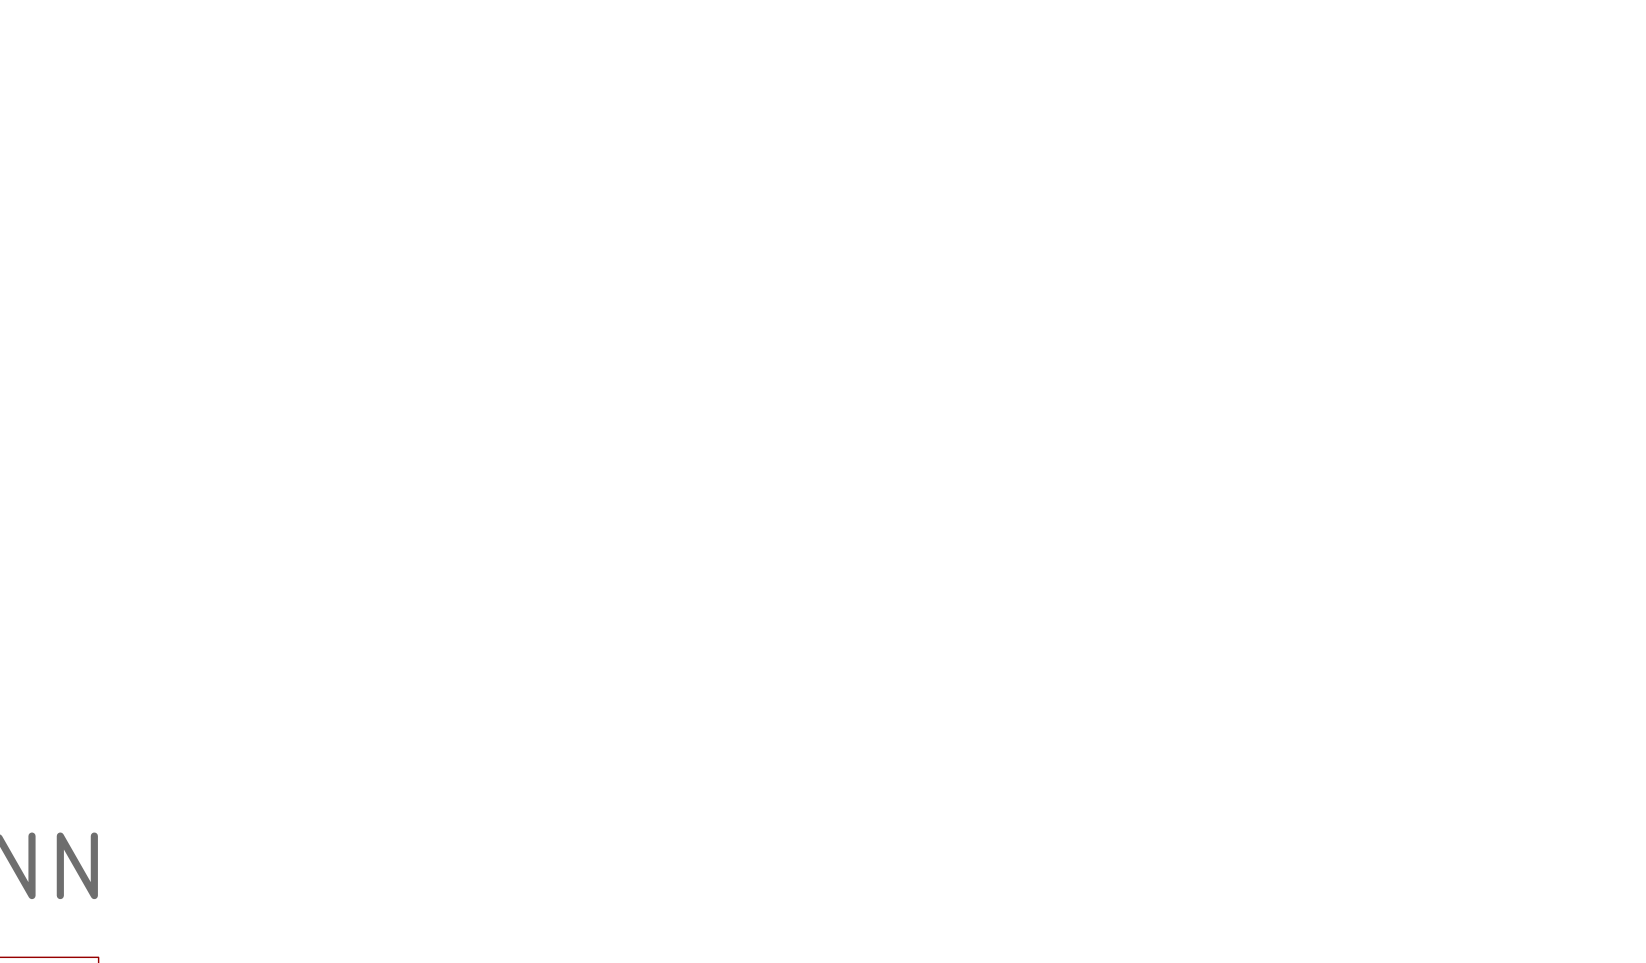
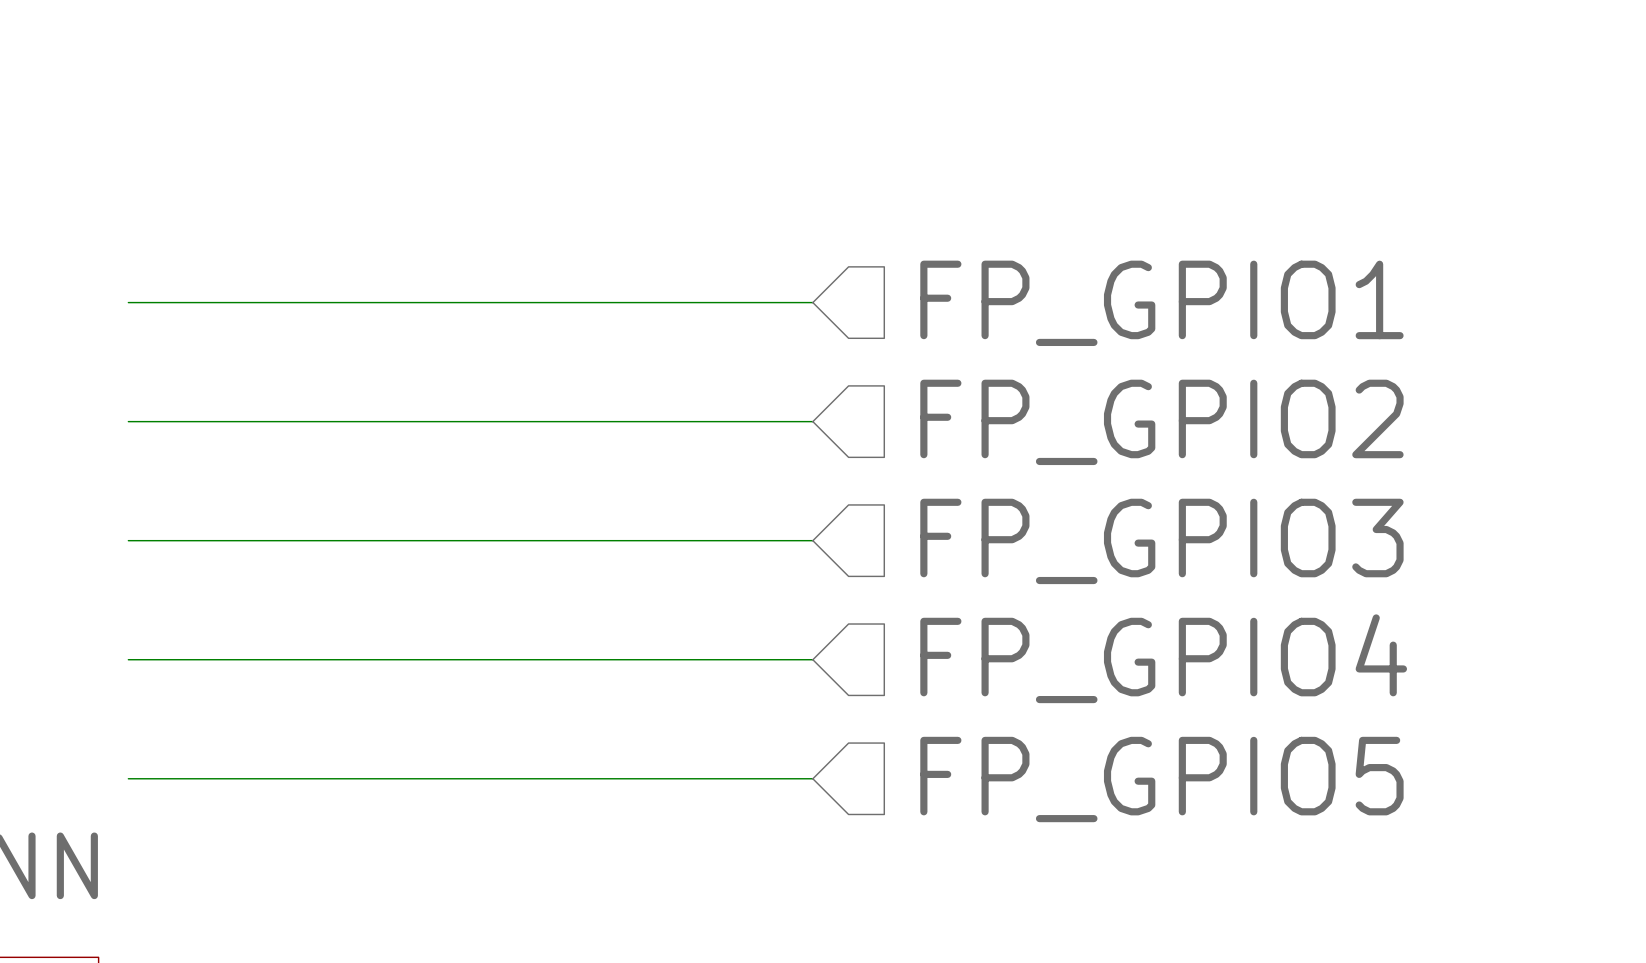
wire: none -> (128, 302) (812, 302)
hierarchical label: none -> FP_GPIO1 (1161, 303)
wire: none -> (128, 421) (812, 421)
hierarchical label: none -> FP_GPIO2 (1161, 422)
wire: none -> (128, 540) (812, 540)
hierarchical label: none -> FP_GPIO3 (1161, 541)
hierarchical label: none -> FP_GPIO4 (1163, 658)
wire: none -> (128, 659) (812, 659)
wire: none -> (128, 778) (812, 778)
hierarchical label: none -> FP_GPIO5 (1161, 779)

